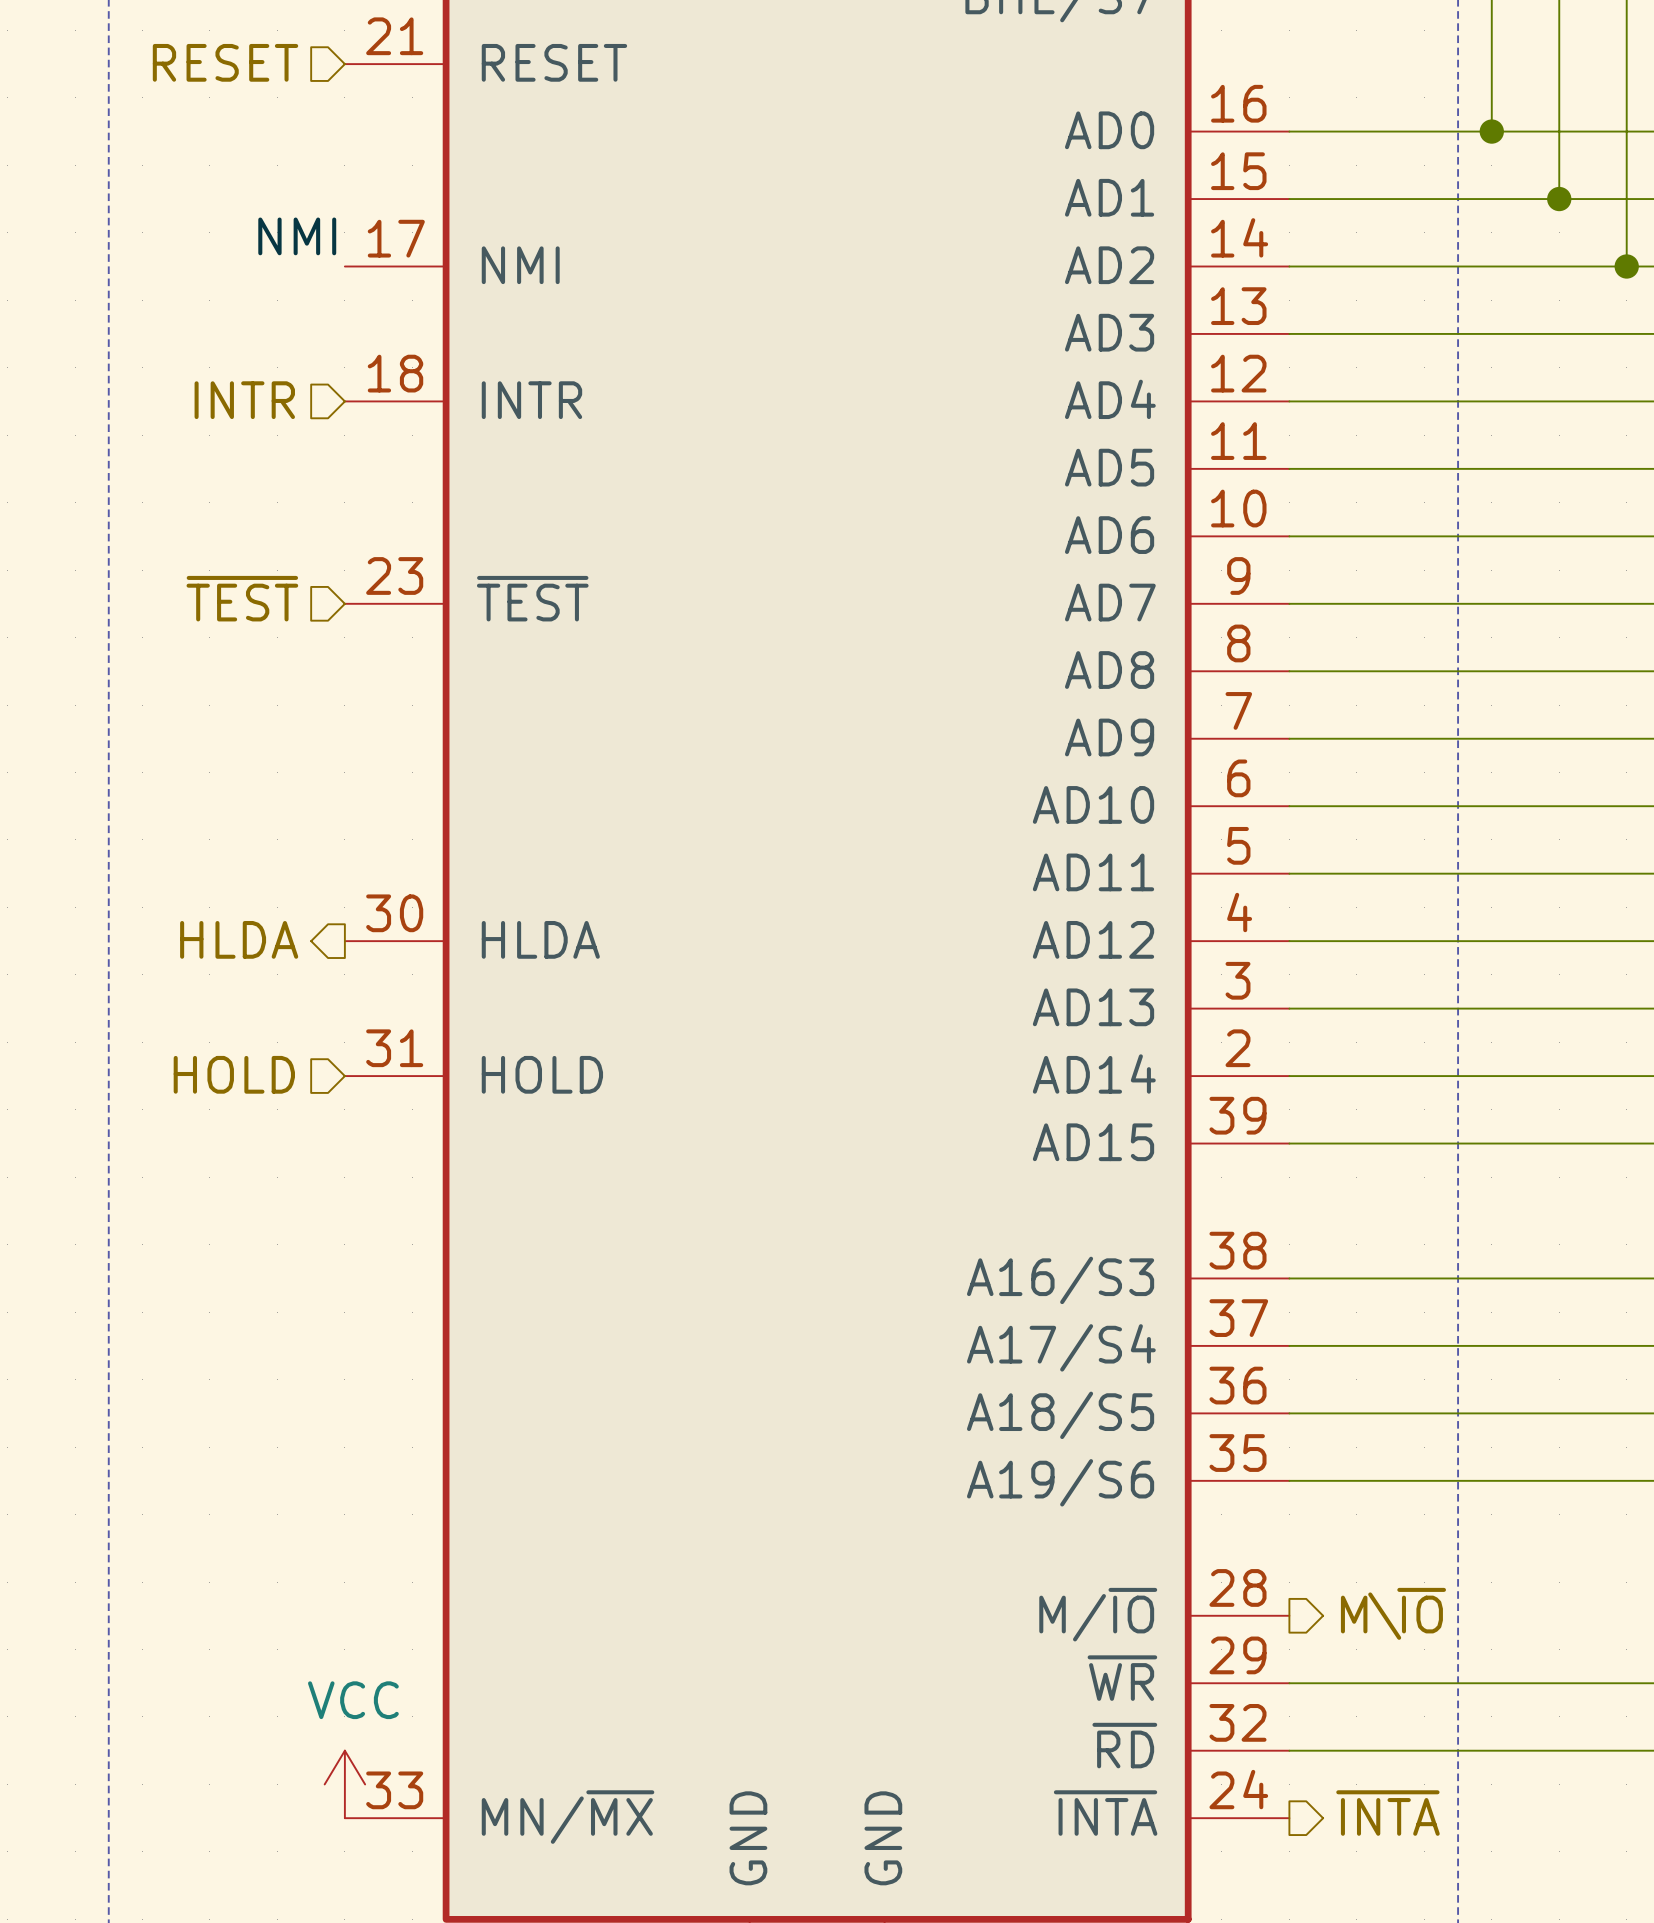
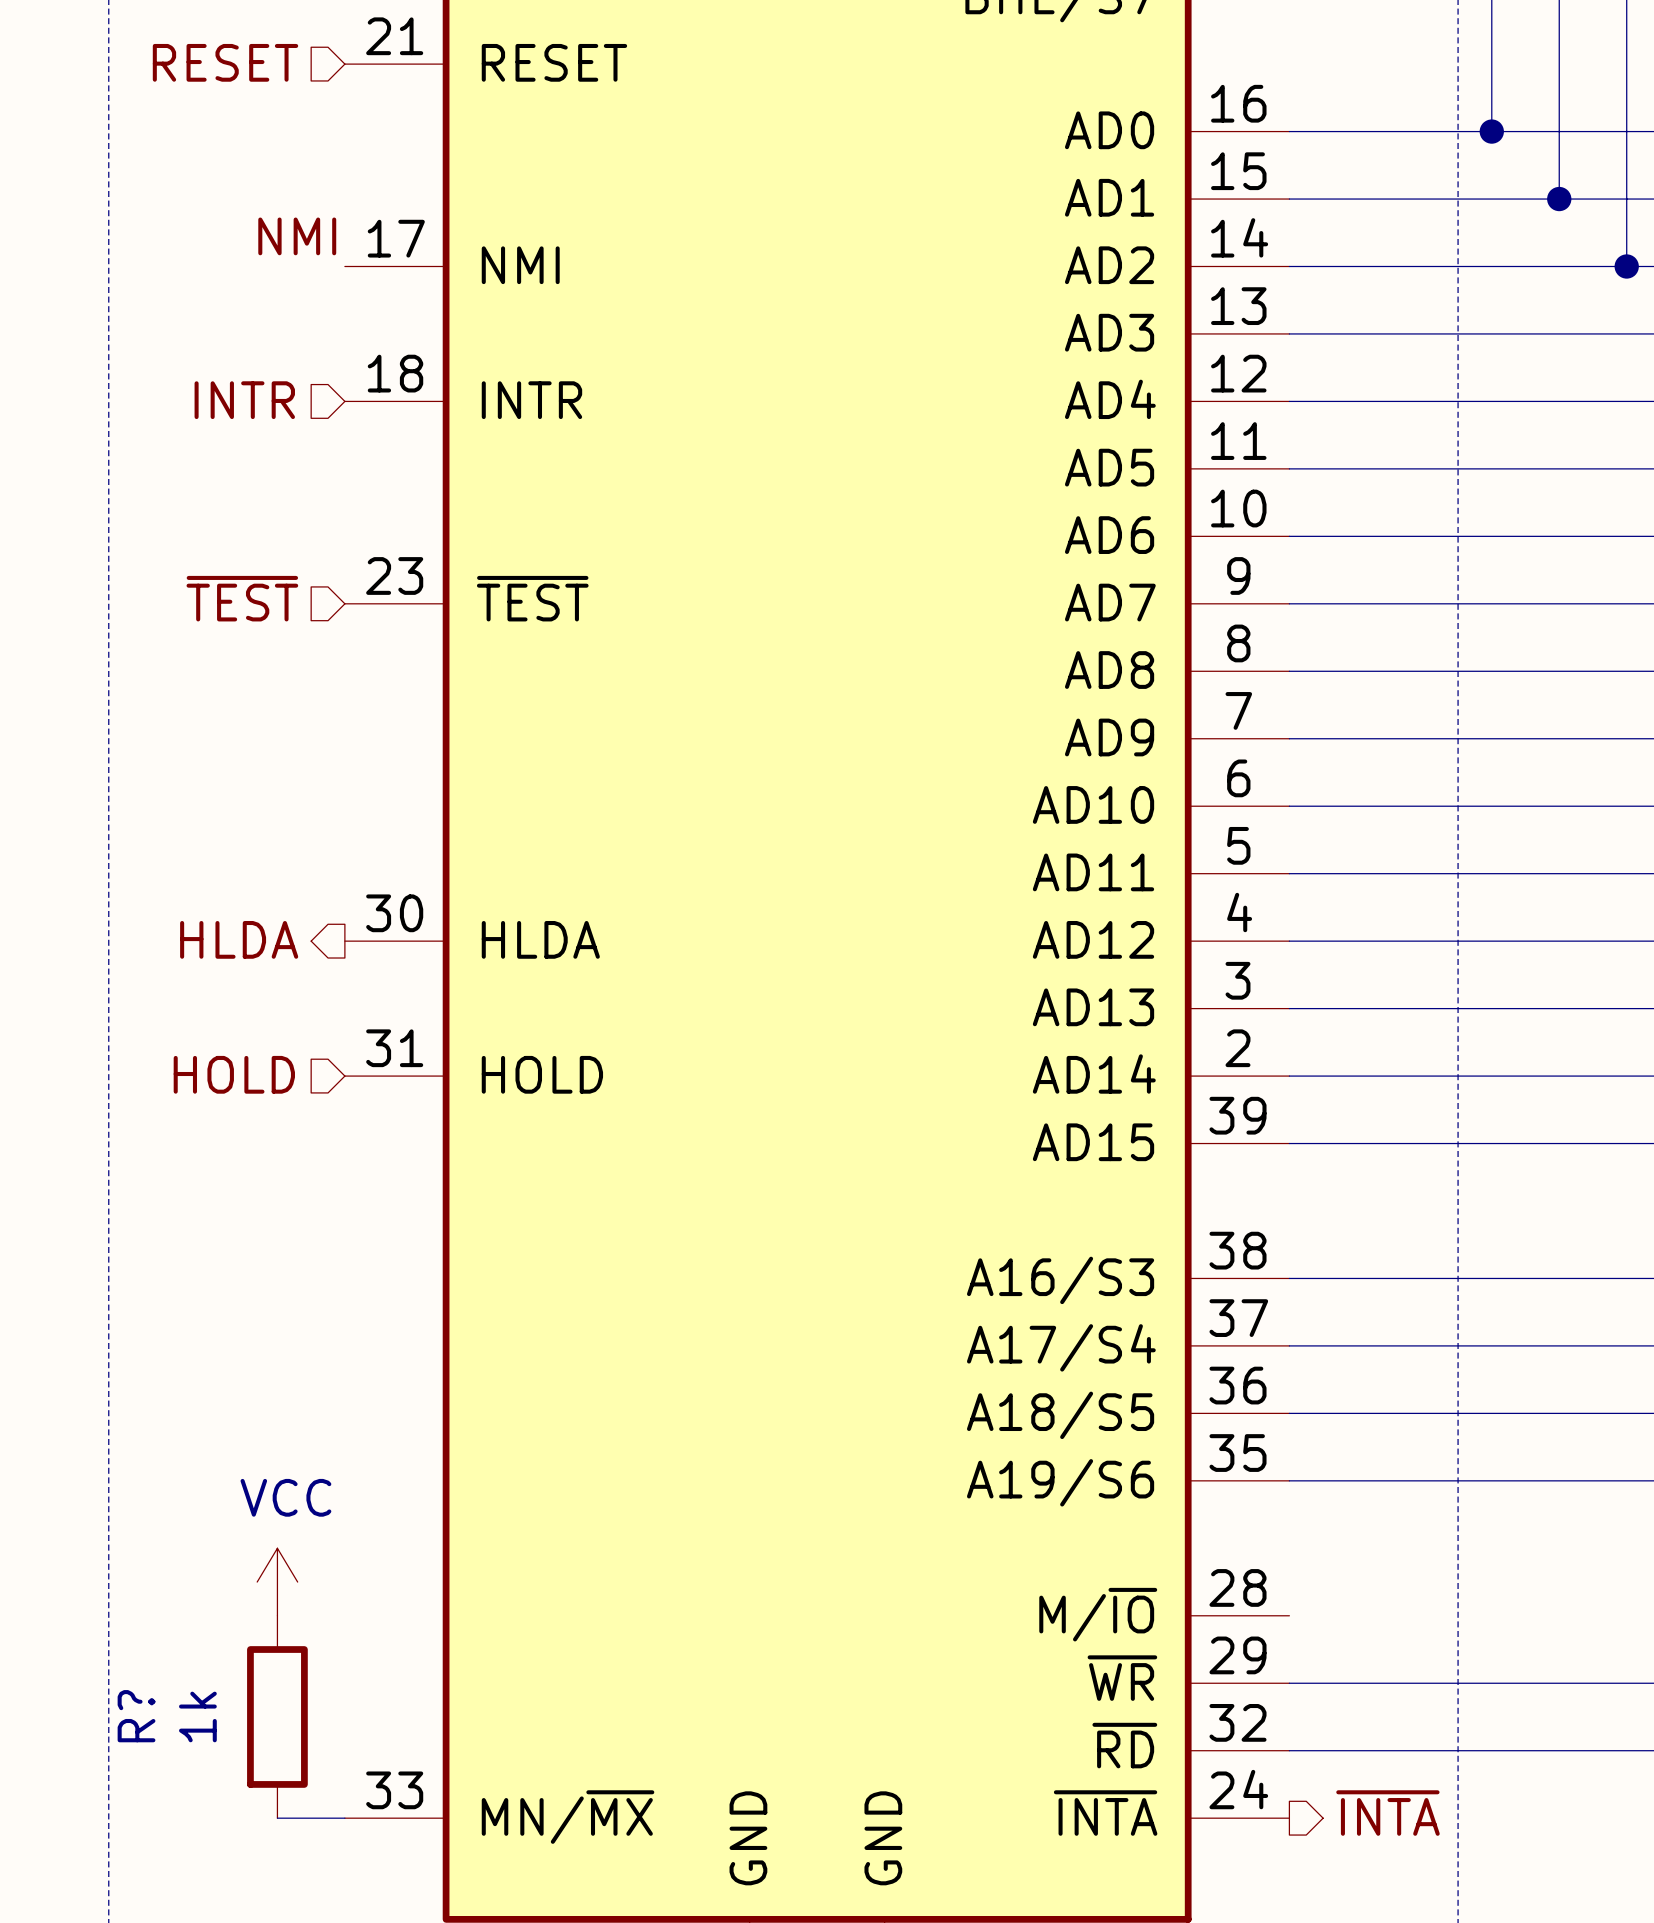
hierarchical label: M\~{IO} (1393, 1613) -> none
R?: none -> 1k (277, 1716)
power symbol position: VCC (344, 1784) -> VCC (277, 1582)
wire: none -> (277, 1818) (344, 1818)

